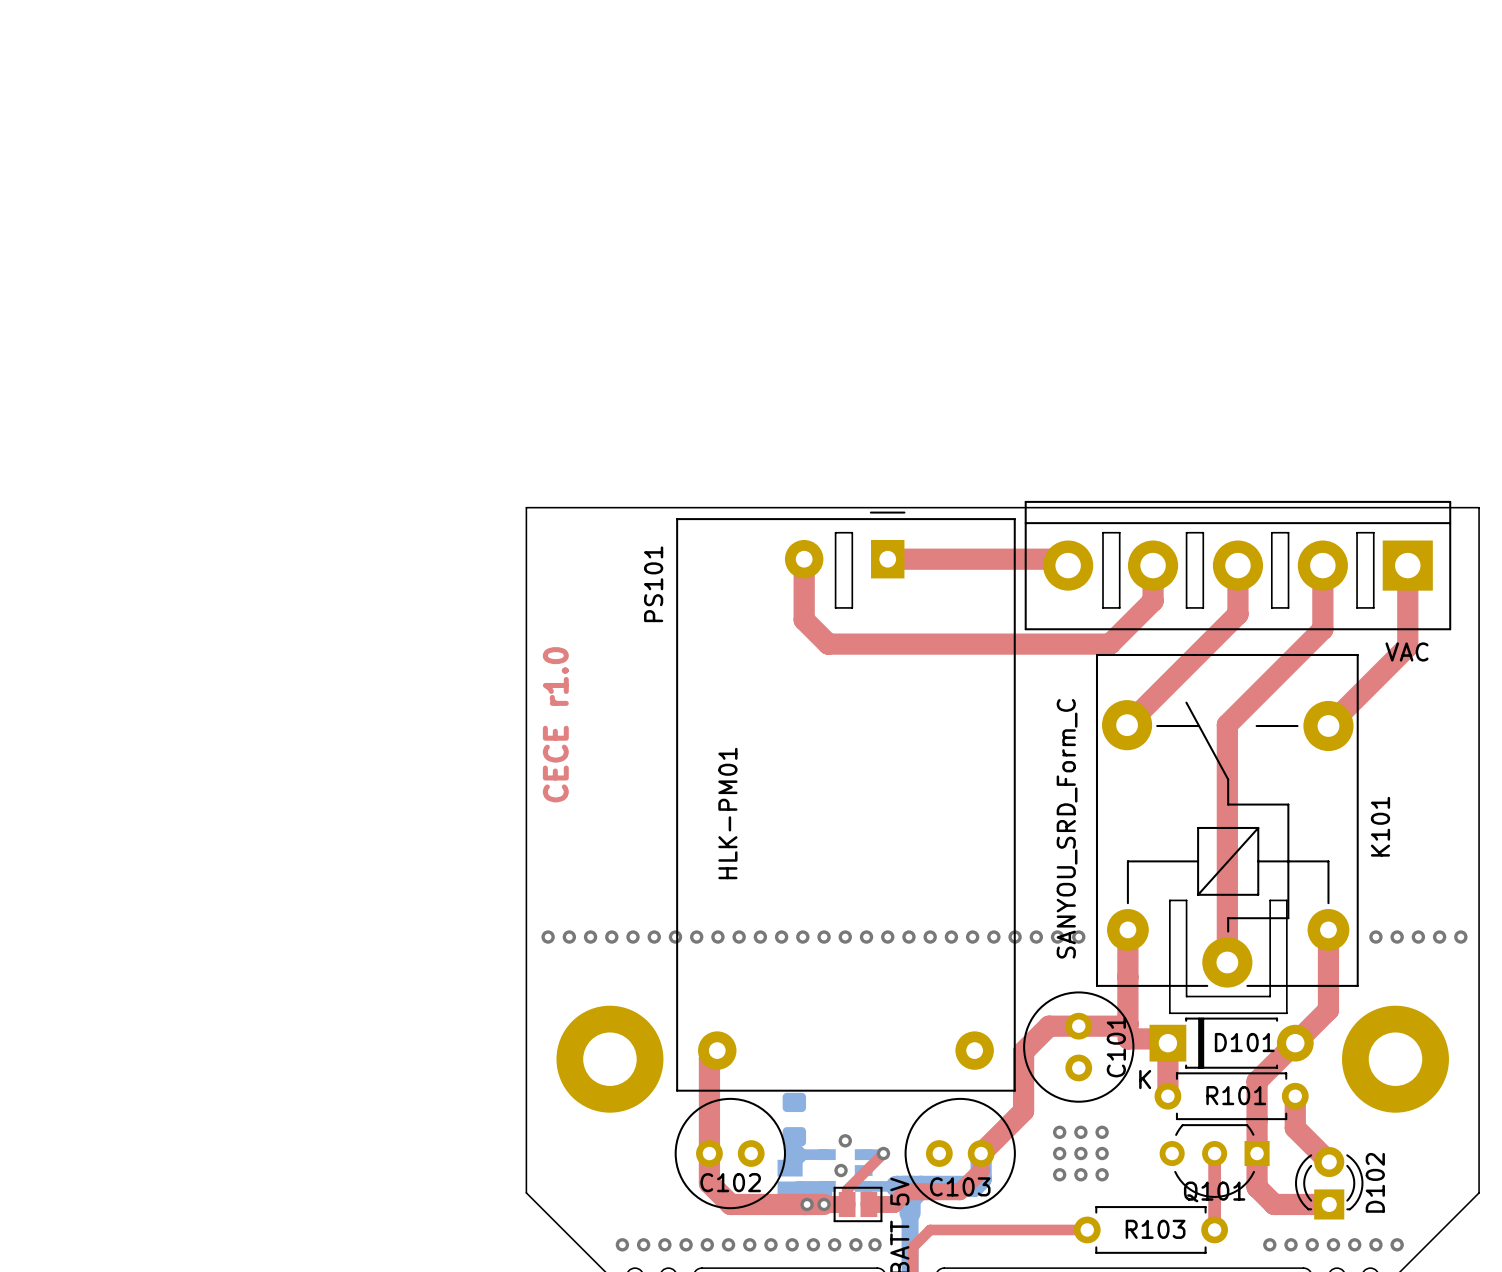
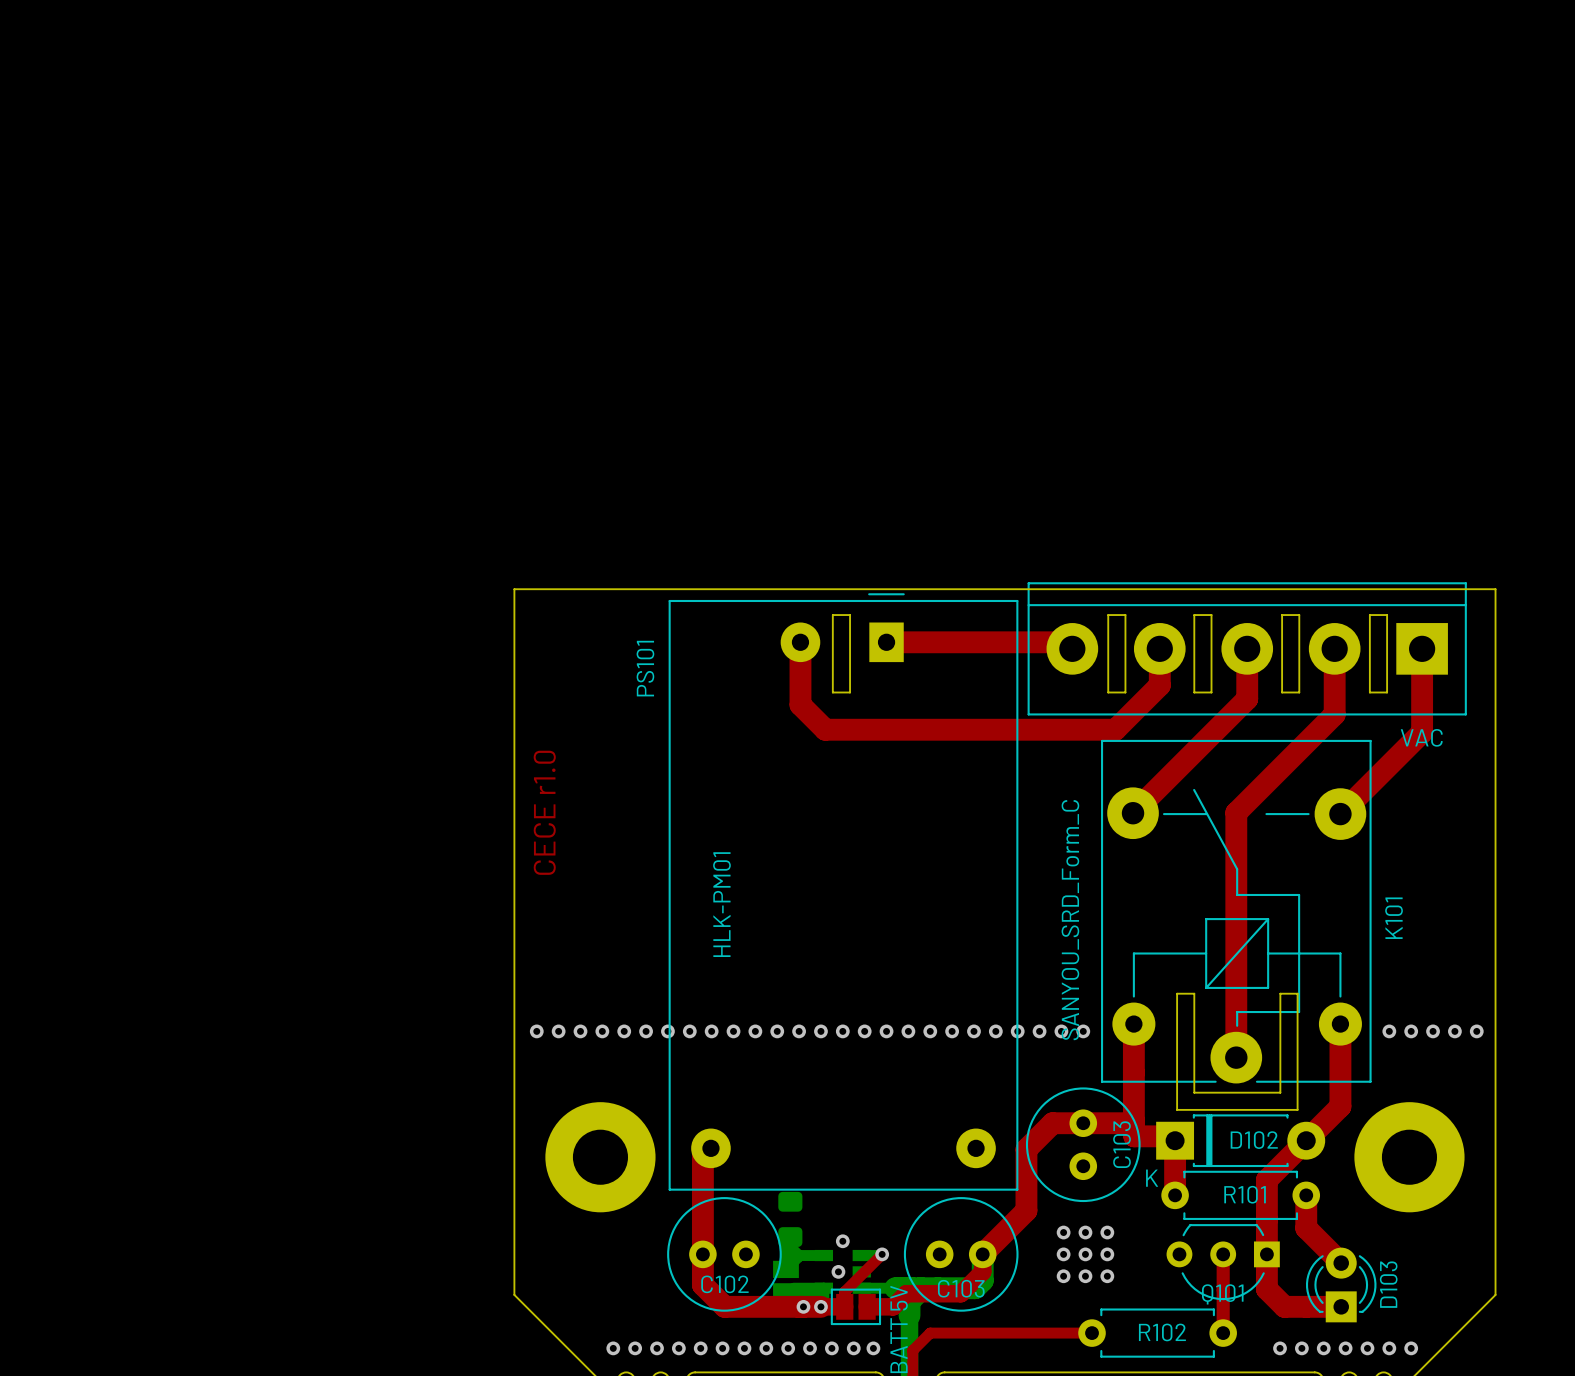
D101 name: D101 (1244, 1042) -> D102 (1254, 1140)
C101 name: C101 (1116, 1047) -> C103 (1122, 1144)
D102 name: D102 (1375, 1182) -> D103 (1388, 1284)
R103 name: R103 (1155, 1229) -> R102 (1162, 1332)

